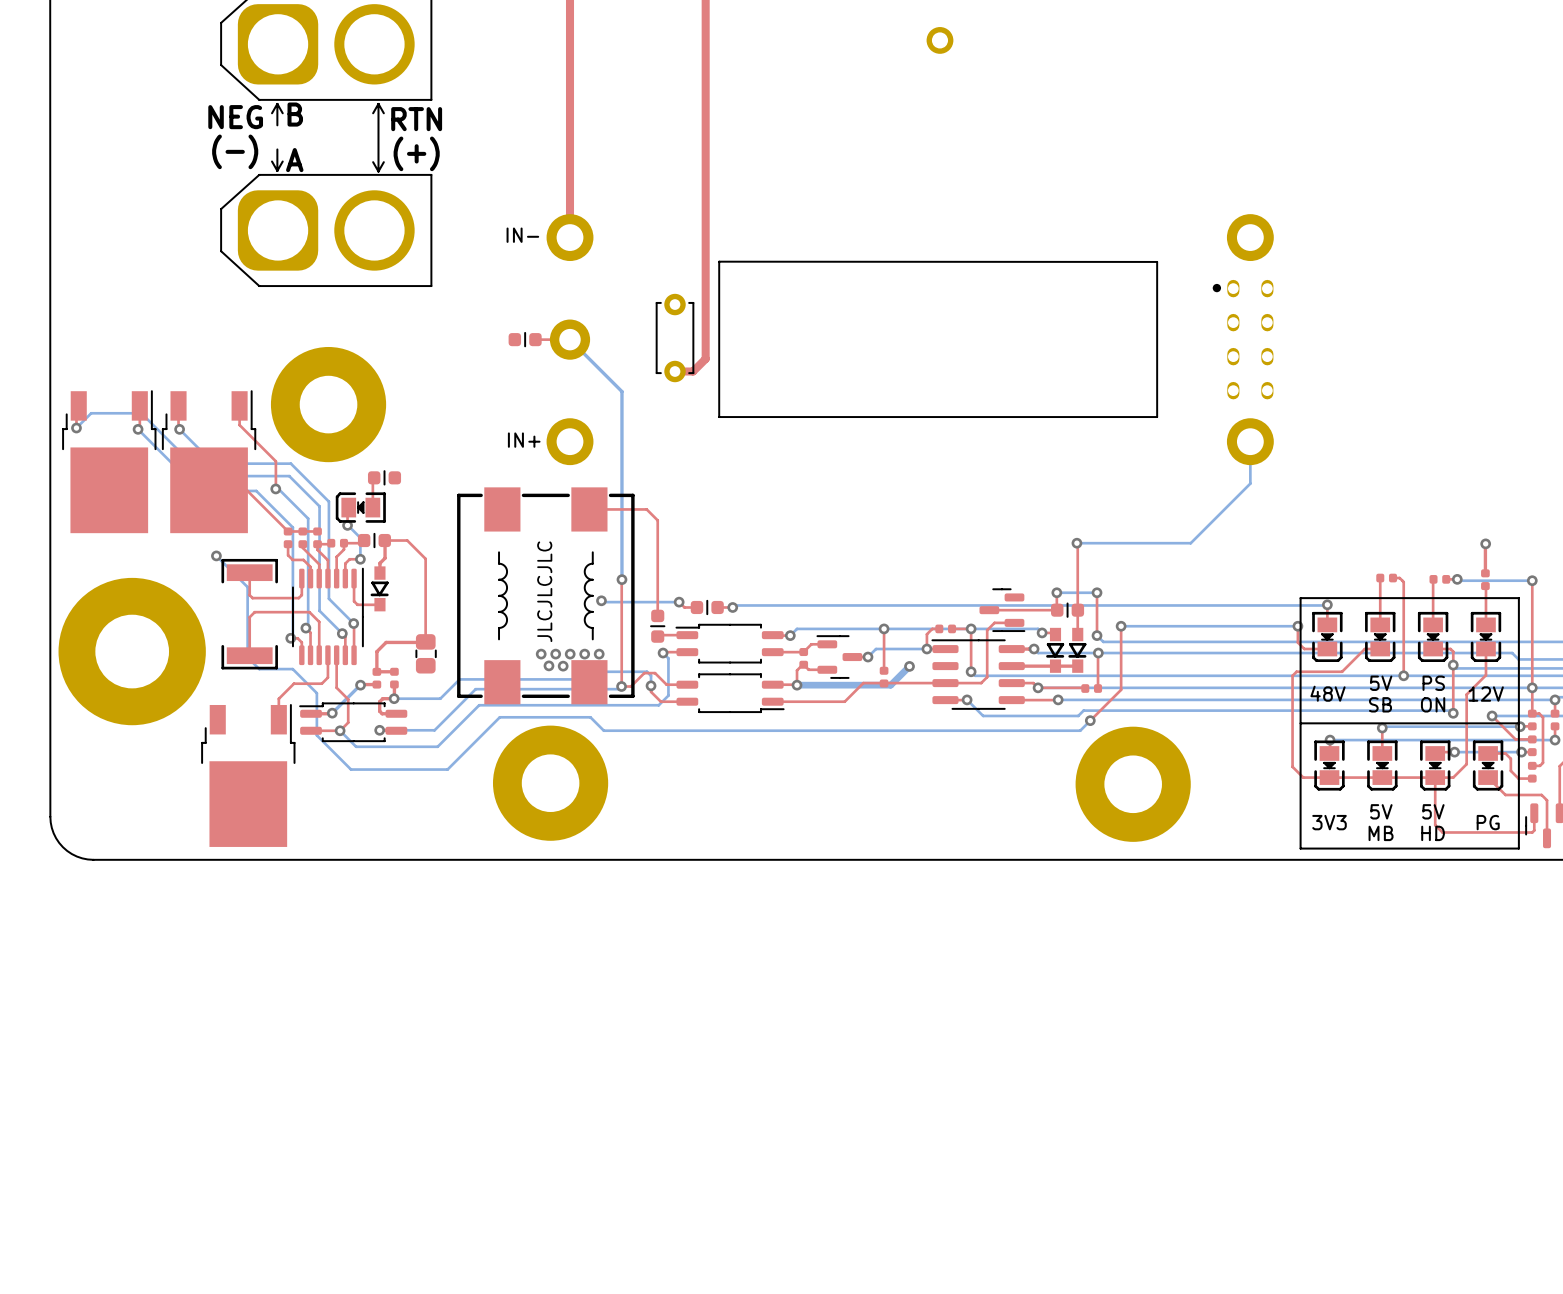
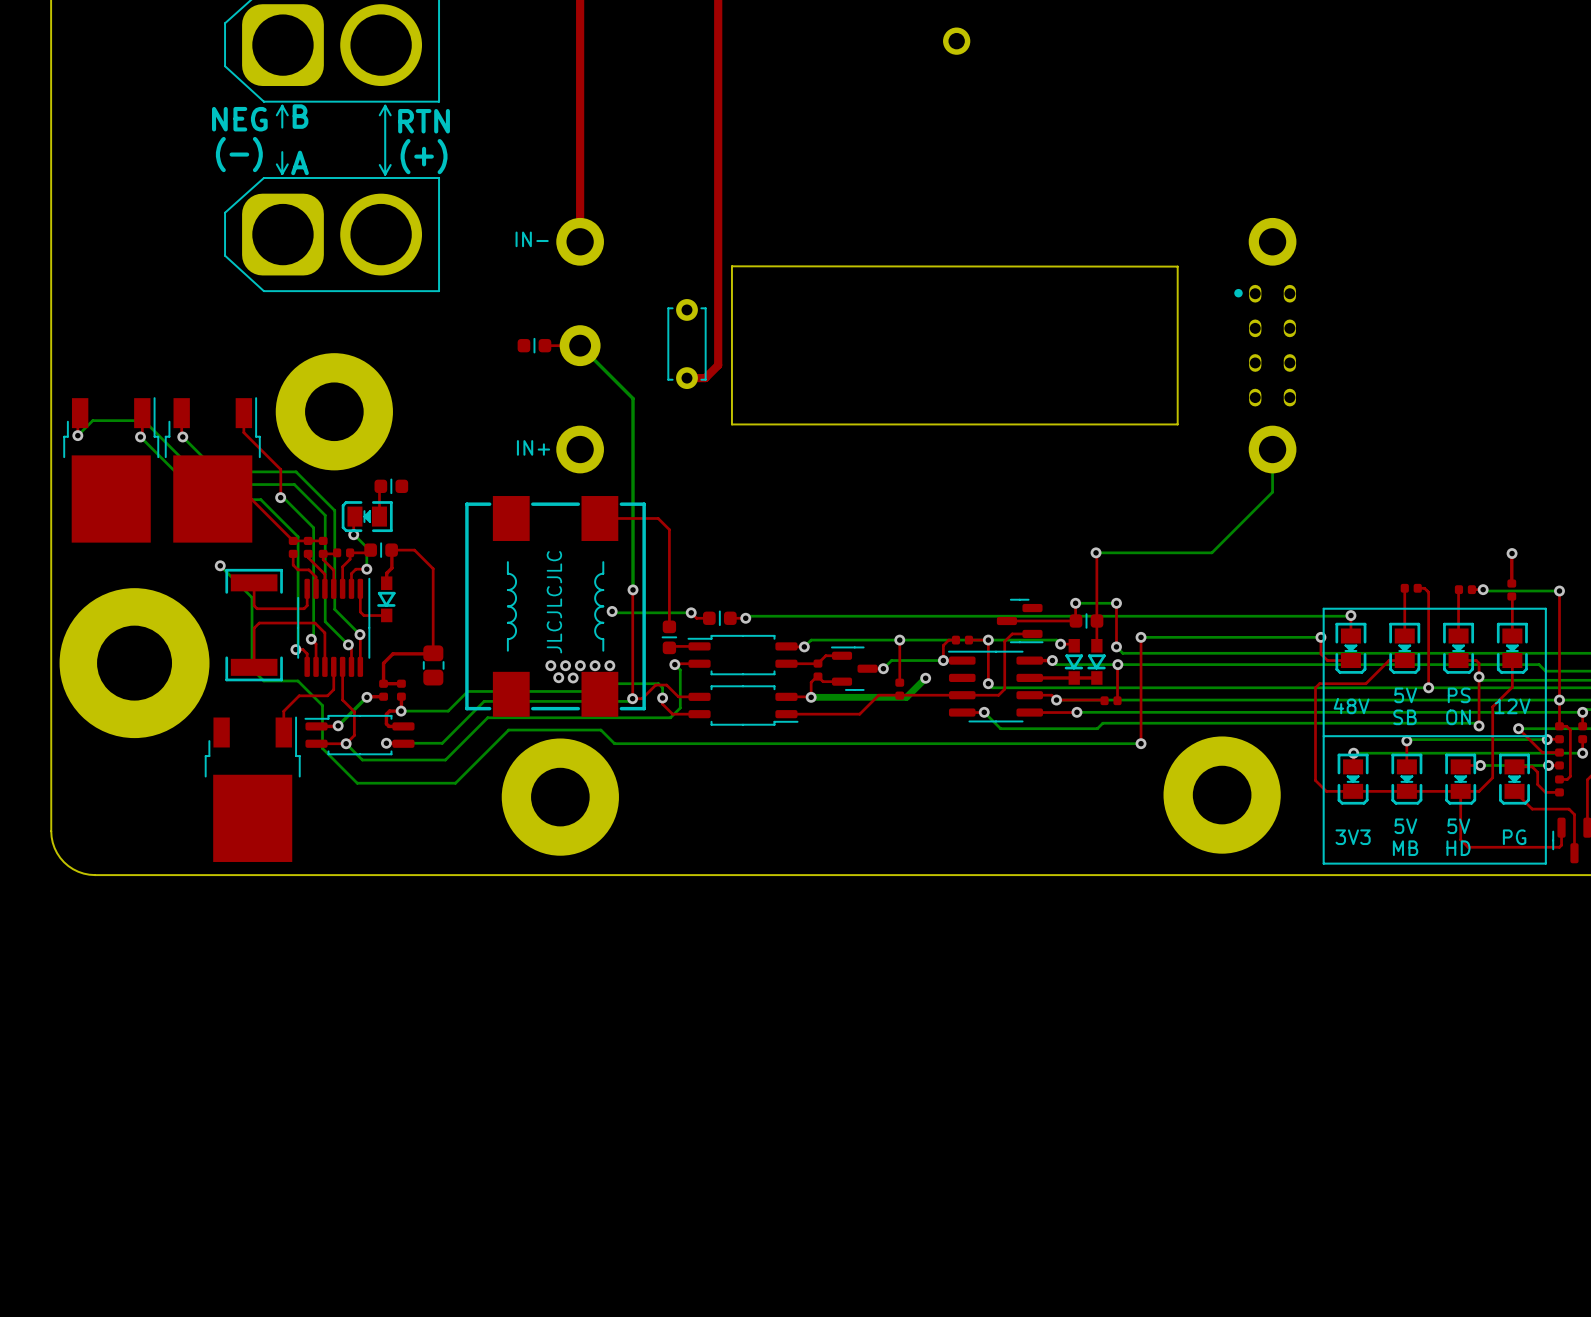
top track: (1121, 689) (1090, 720) -> (1141, 702) (1141, 743)
bottom track: (1090, 720) (1080, 730) -> (1141, 743) (1099, 743)
via position: (1090, 720) -> (1141, 743)
part position: (1133, 784) -> (1222, 795)

